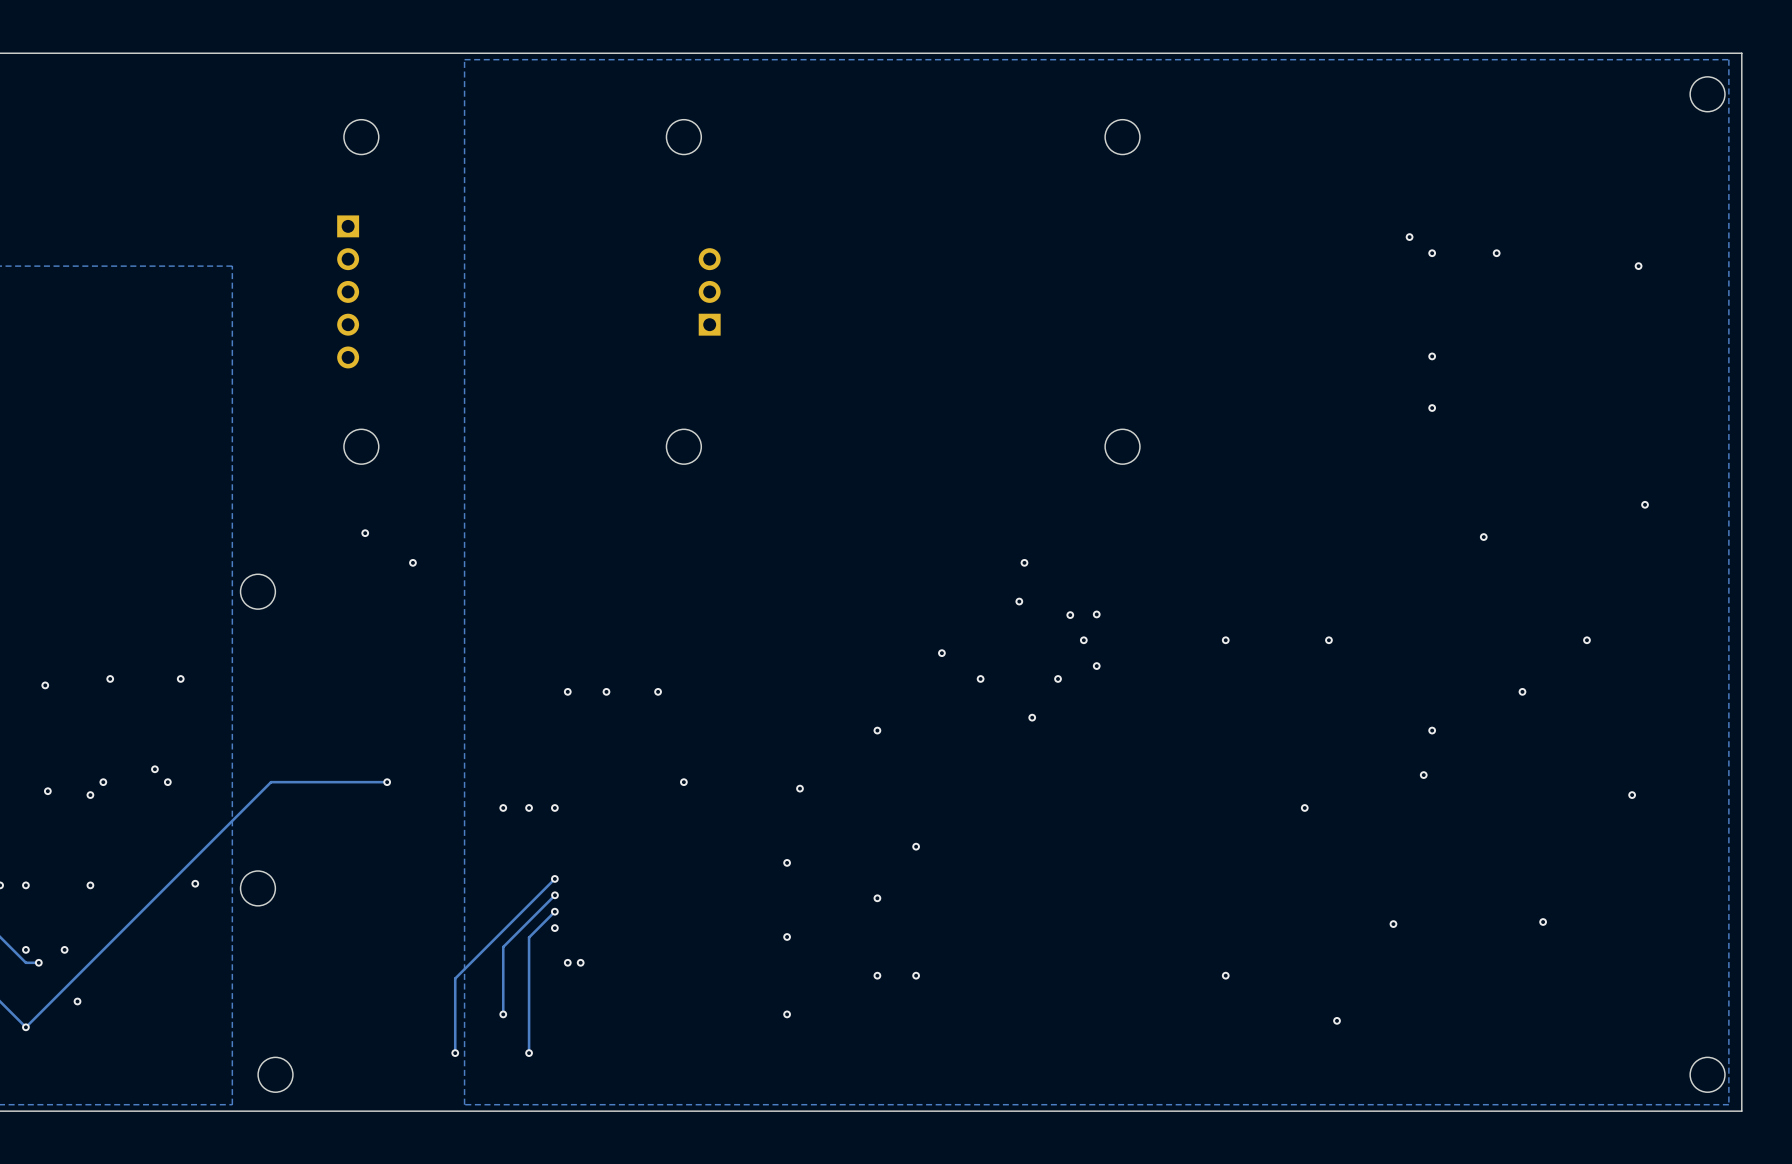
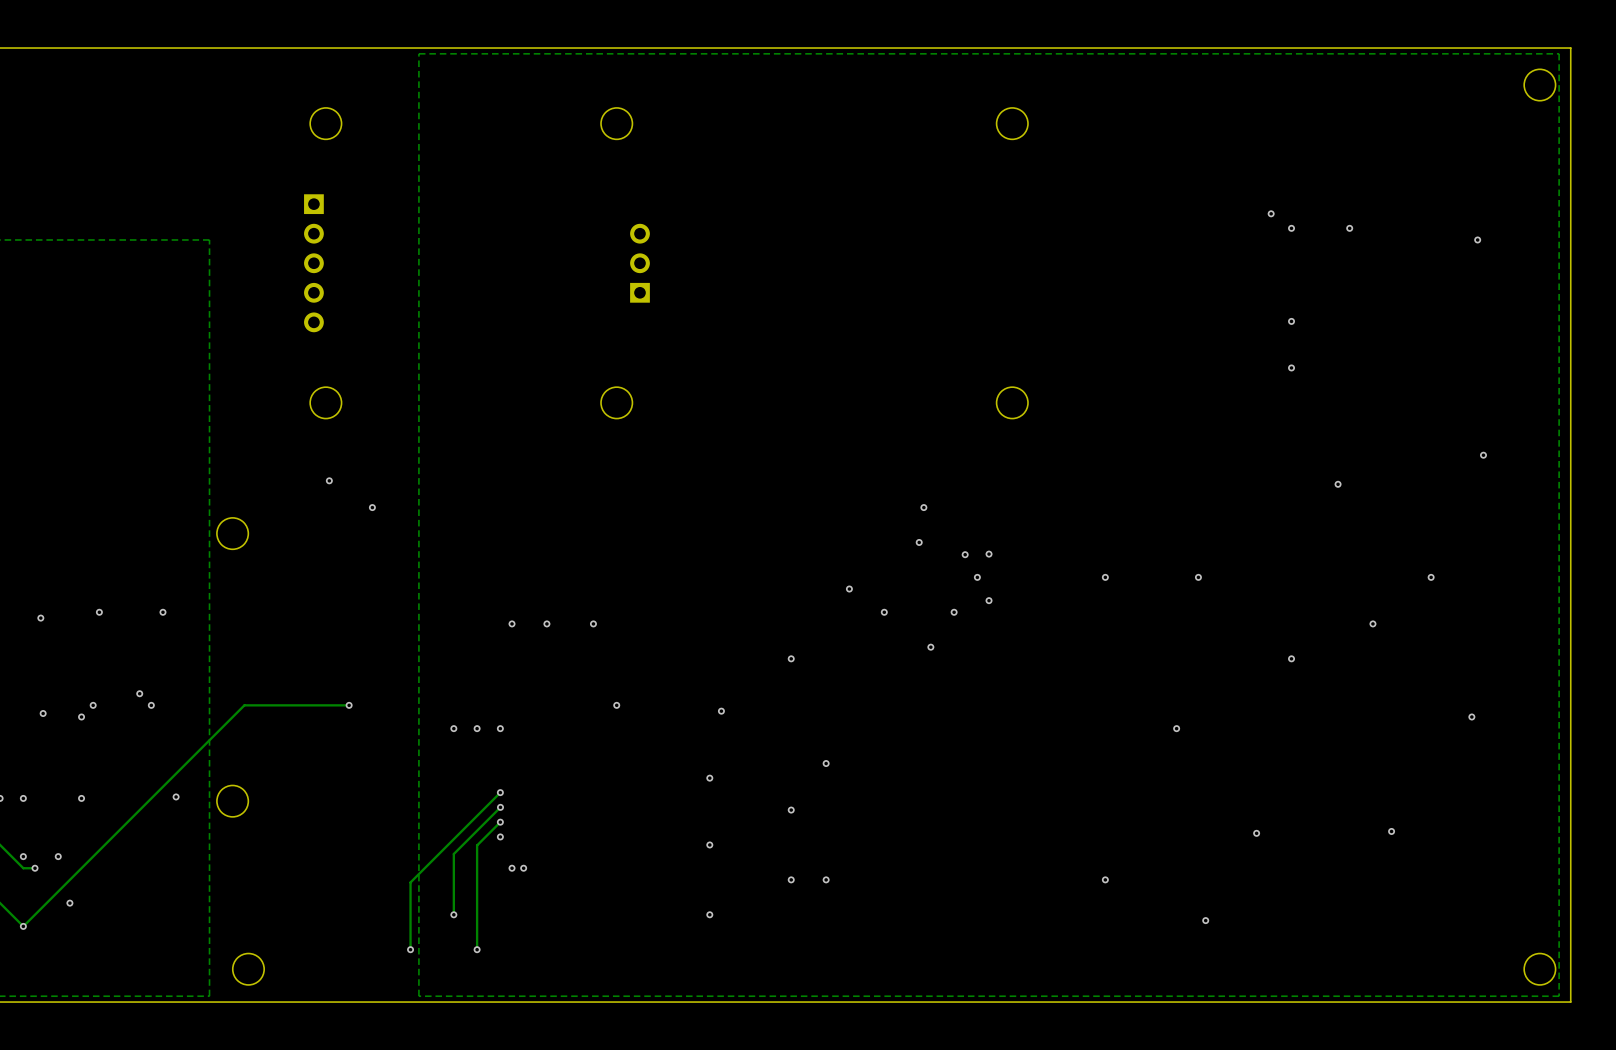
via: (1423, 775) -> none

